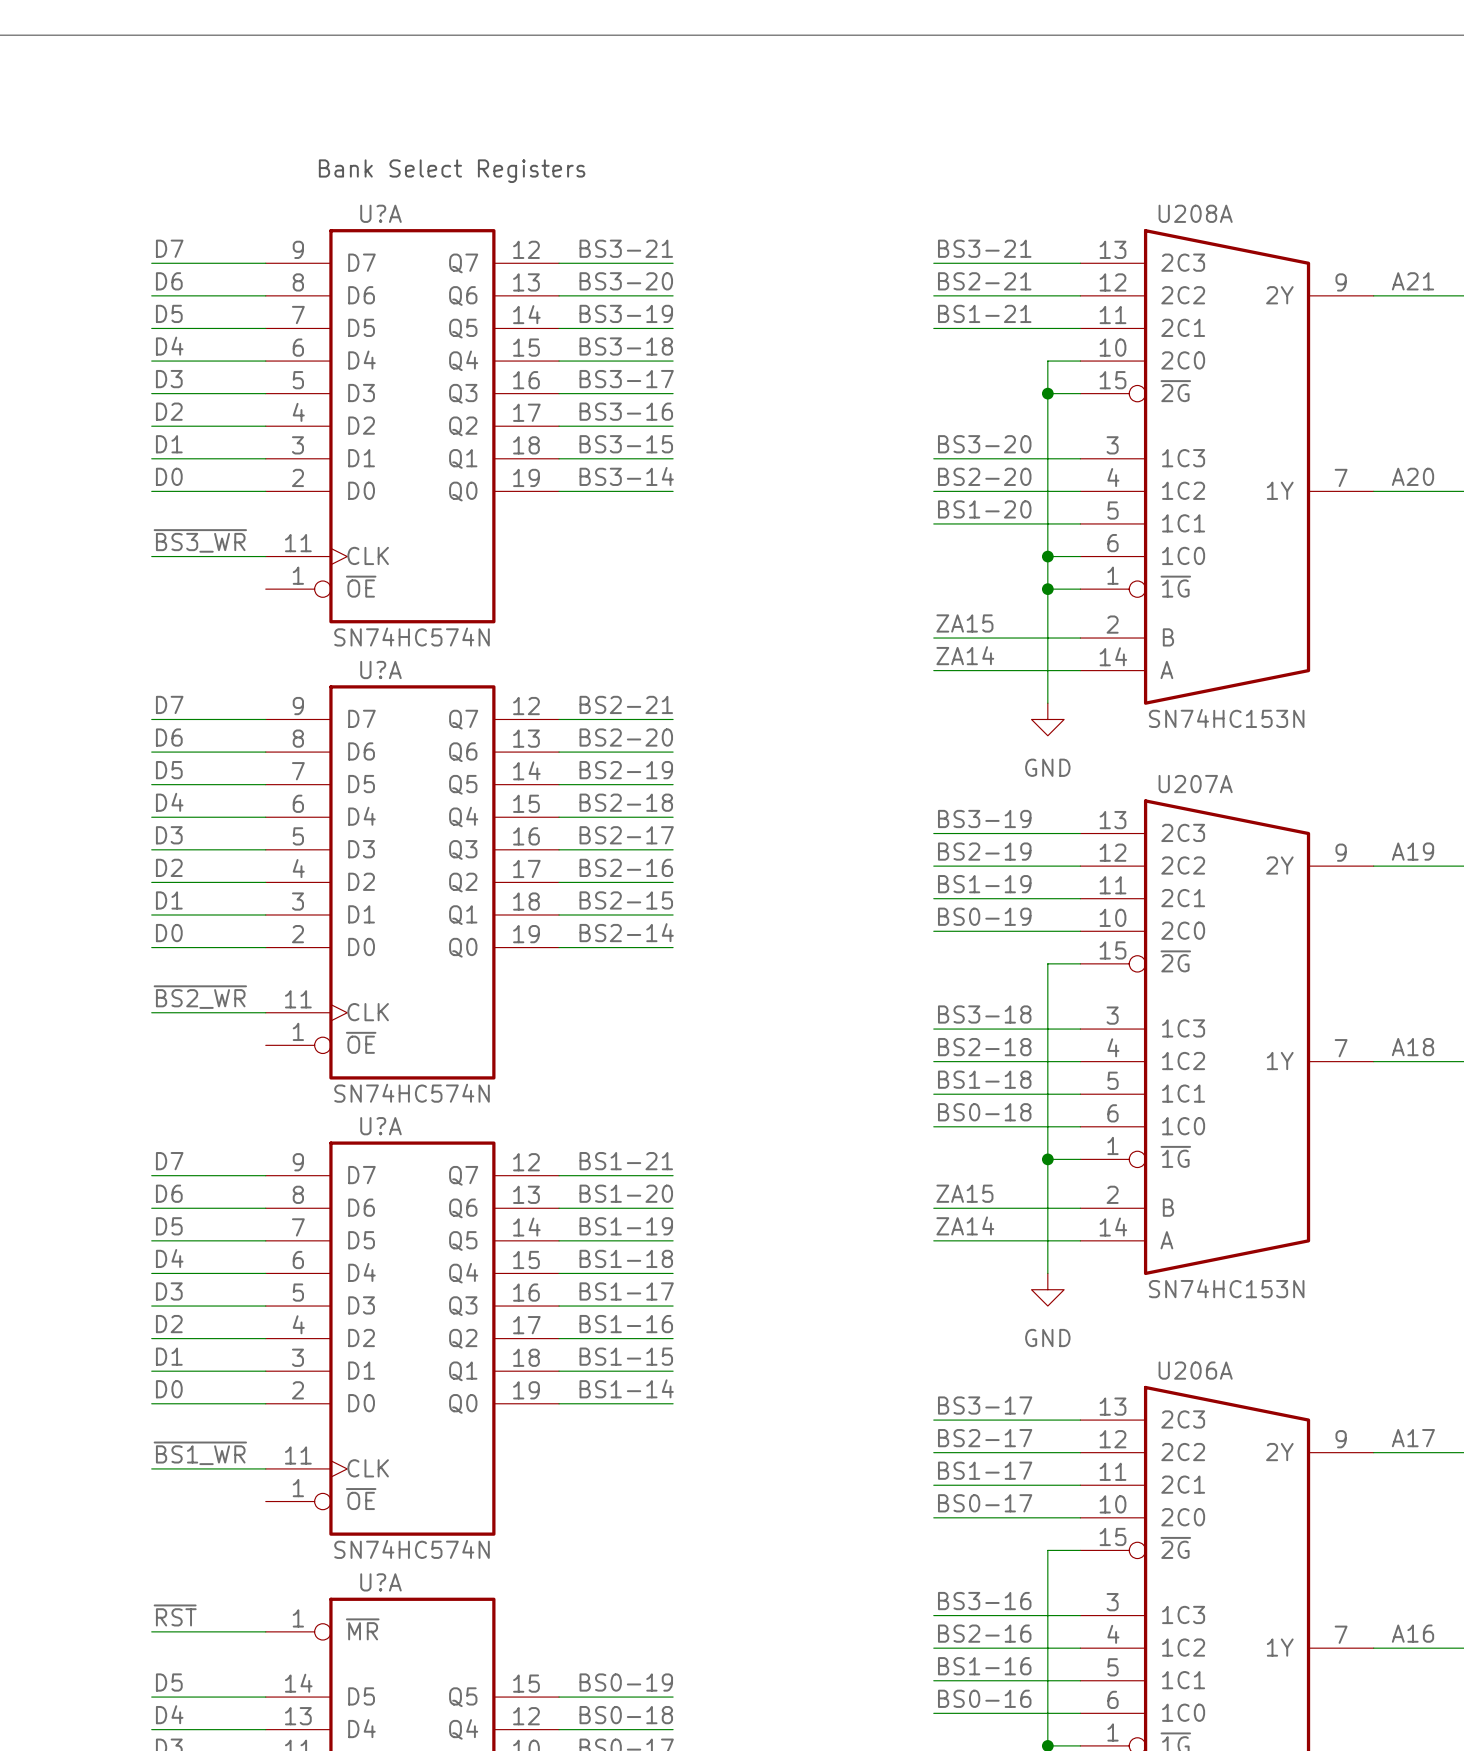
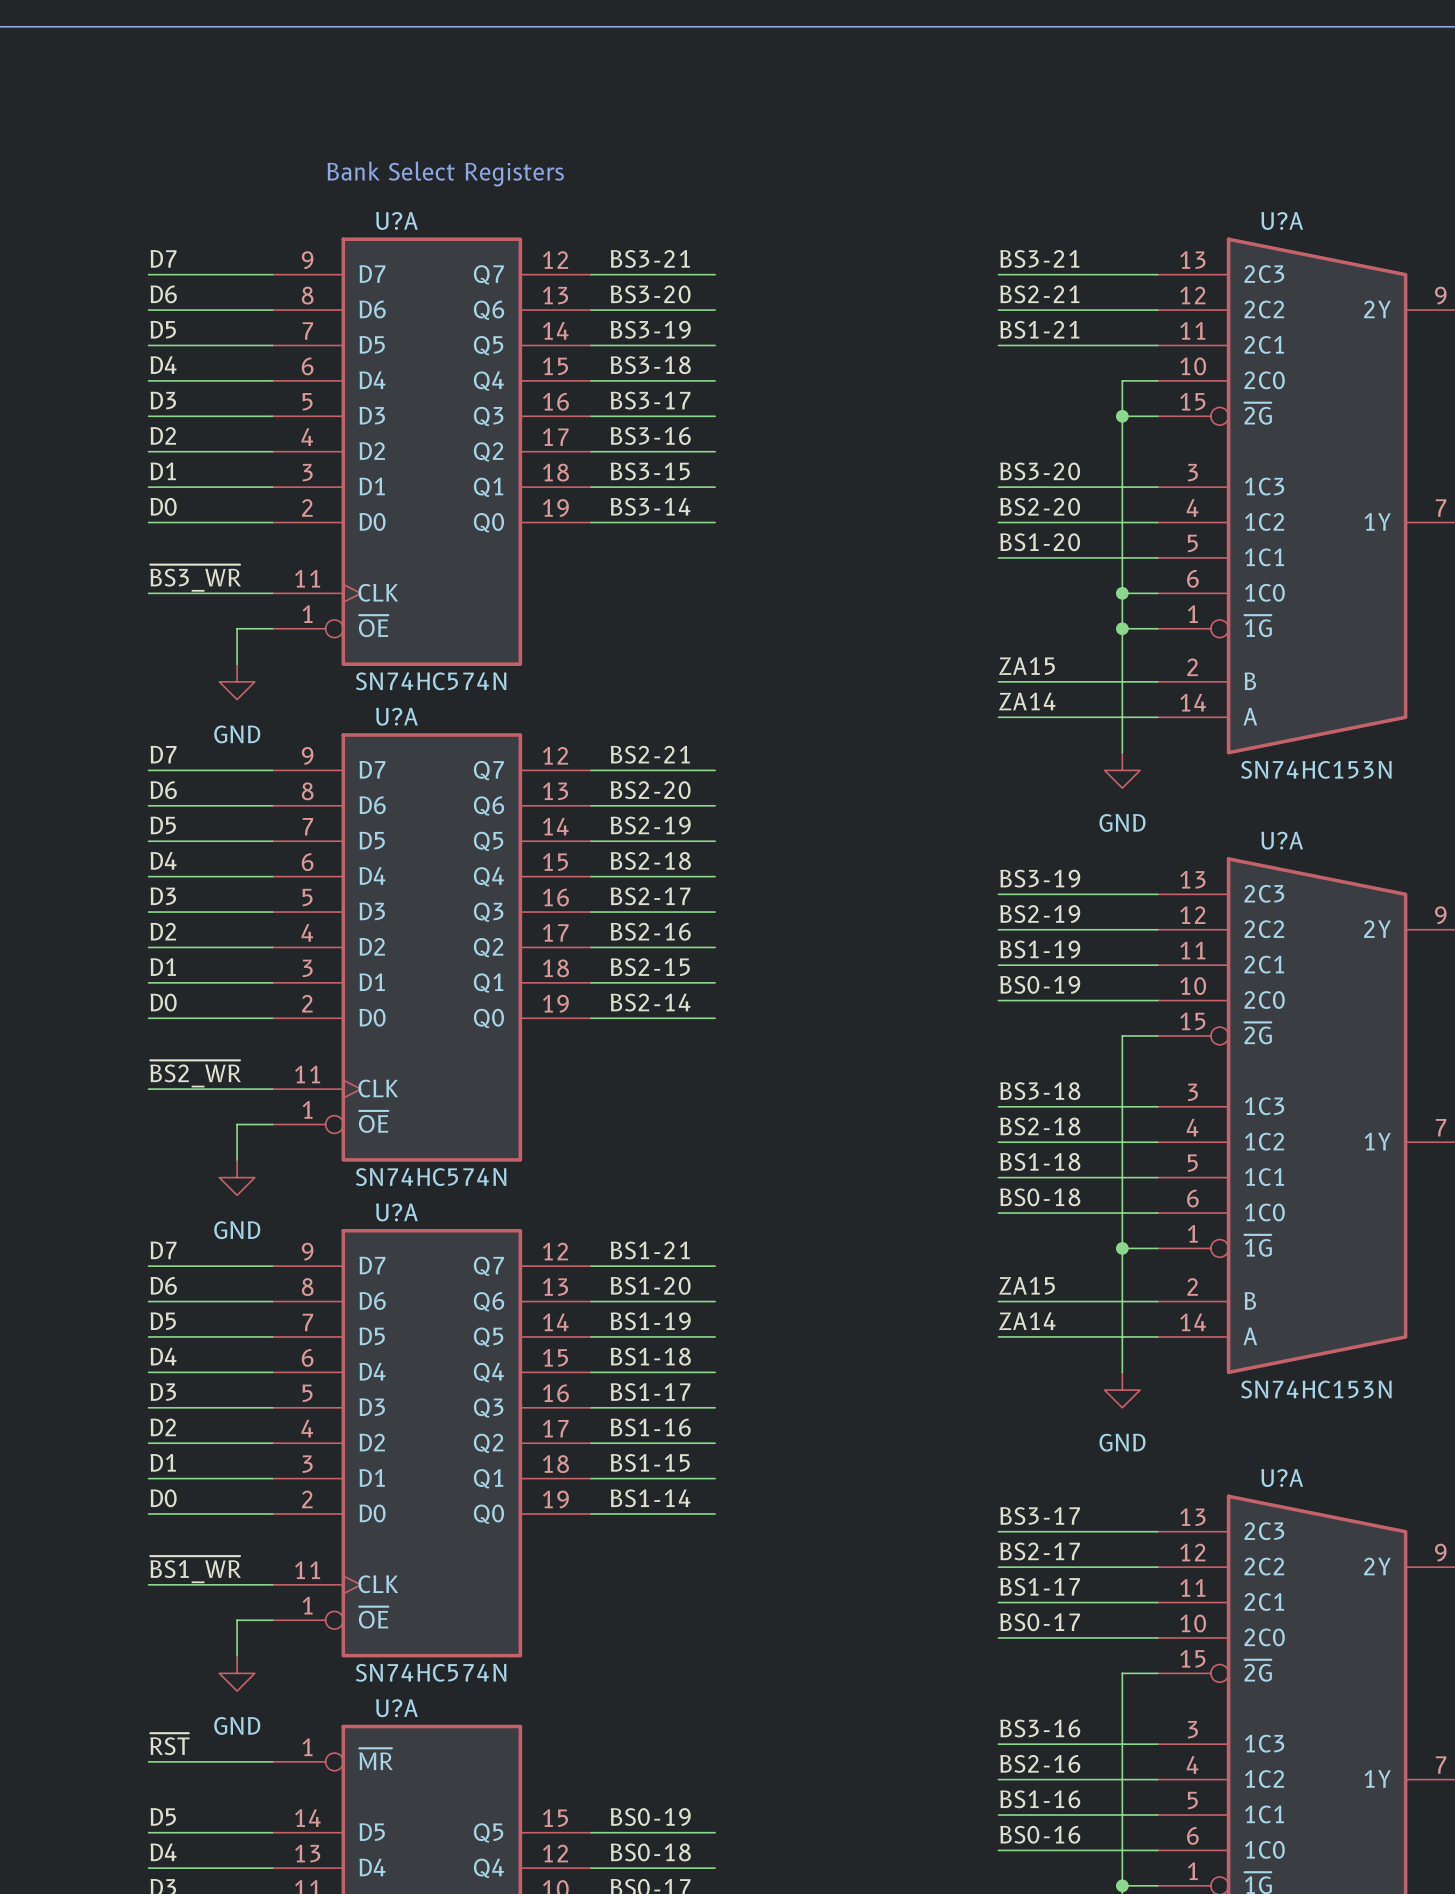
U208A name: U208A (1195, 213) -> U?A (1282, 220)
wire: none -> (272, 628) (237, 628) (237, 664)
power symbol: none -> GND (237, 681)
U207A name: U207A (1195, 784) -> U?A (1282, 840)
wire: none -> (272, 1124) (237, 1124) (237, 1159)
power symbol: none -> GND (237, 1177)
U206A name: U206A (1195, 1370) -> U?A (1282, 1478)
wire: none -> (272, 1620) (237, 1620) (237, 1655)
power symbol: none -> GND (237, 1673)

